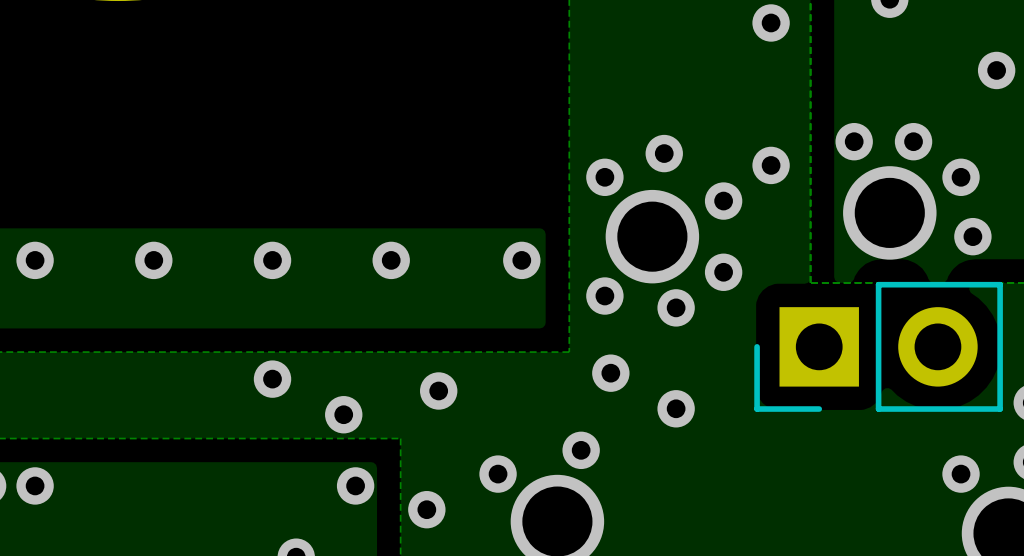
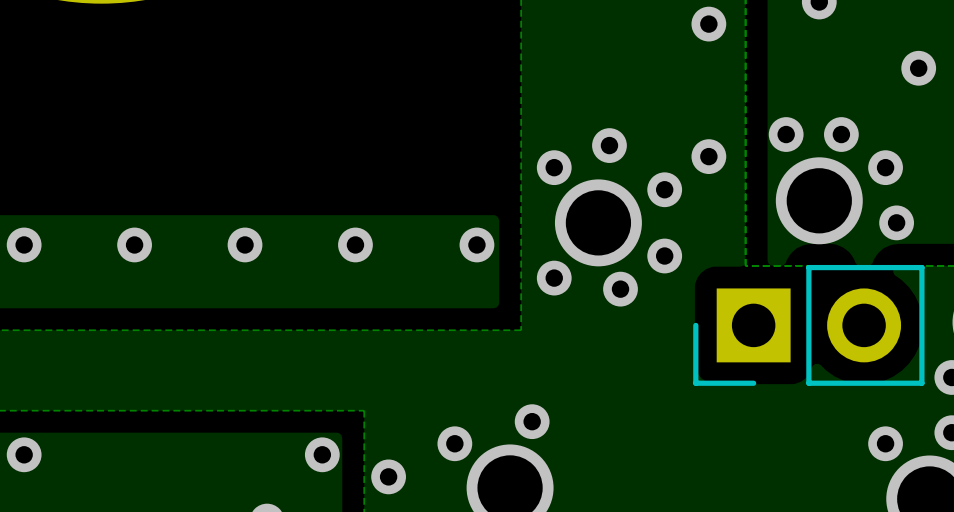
via: (610, 373) -> none
via: (272, 379) -> none
via: (438, 390) -> none
via: (676, 408) -> none
via: (343, 414) -> none

